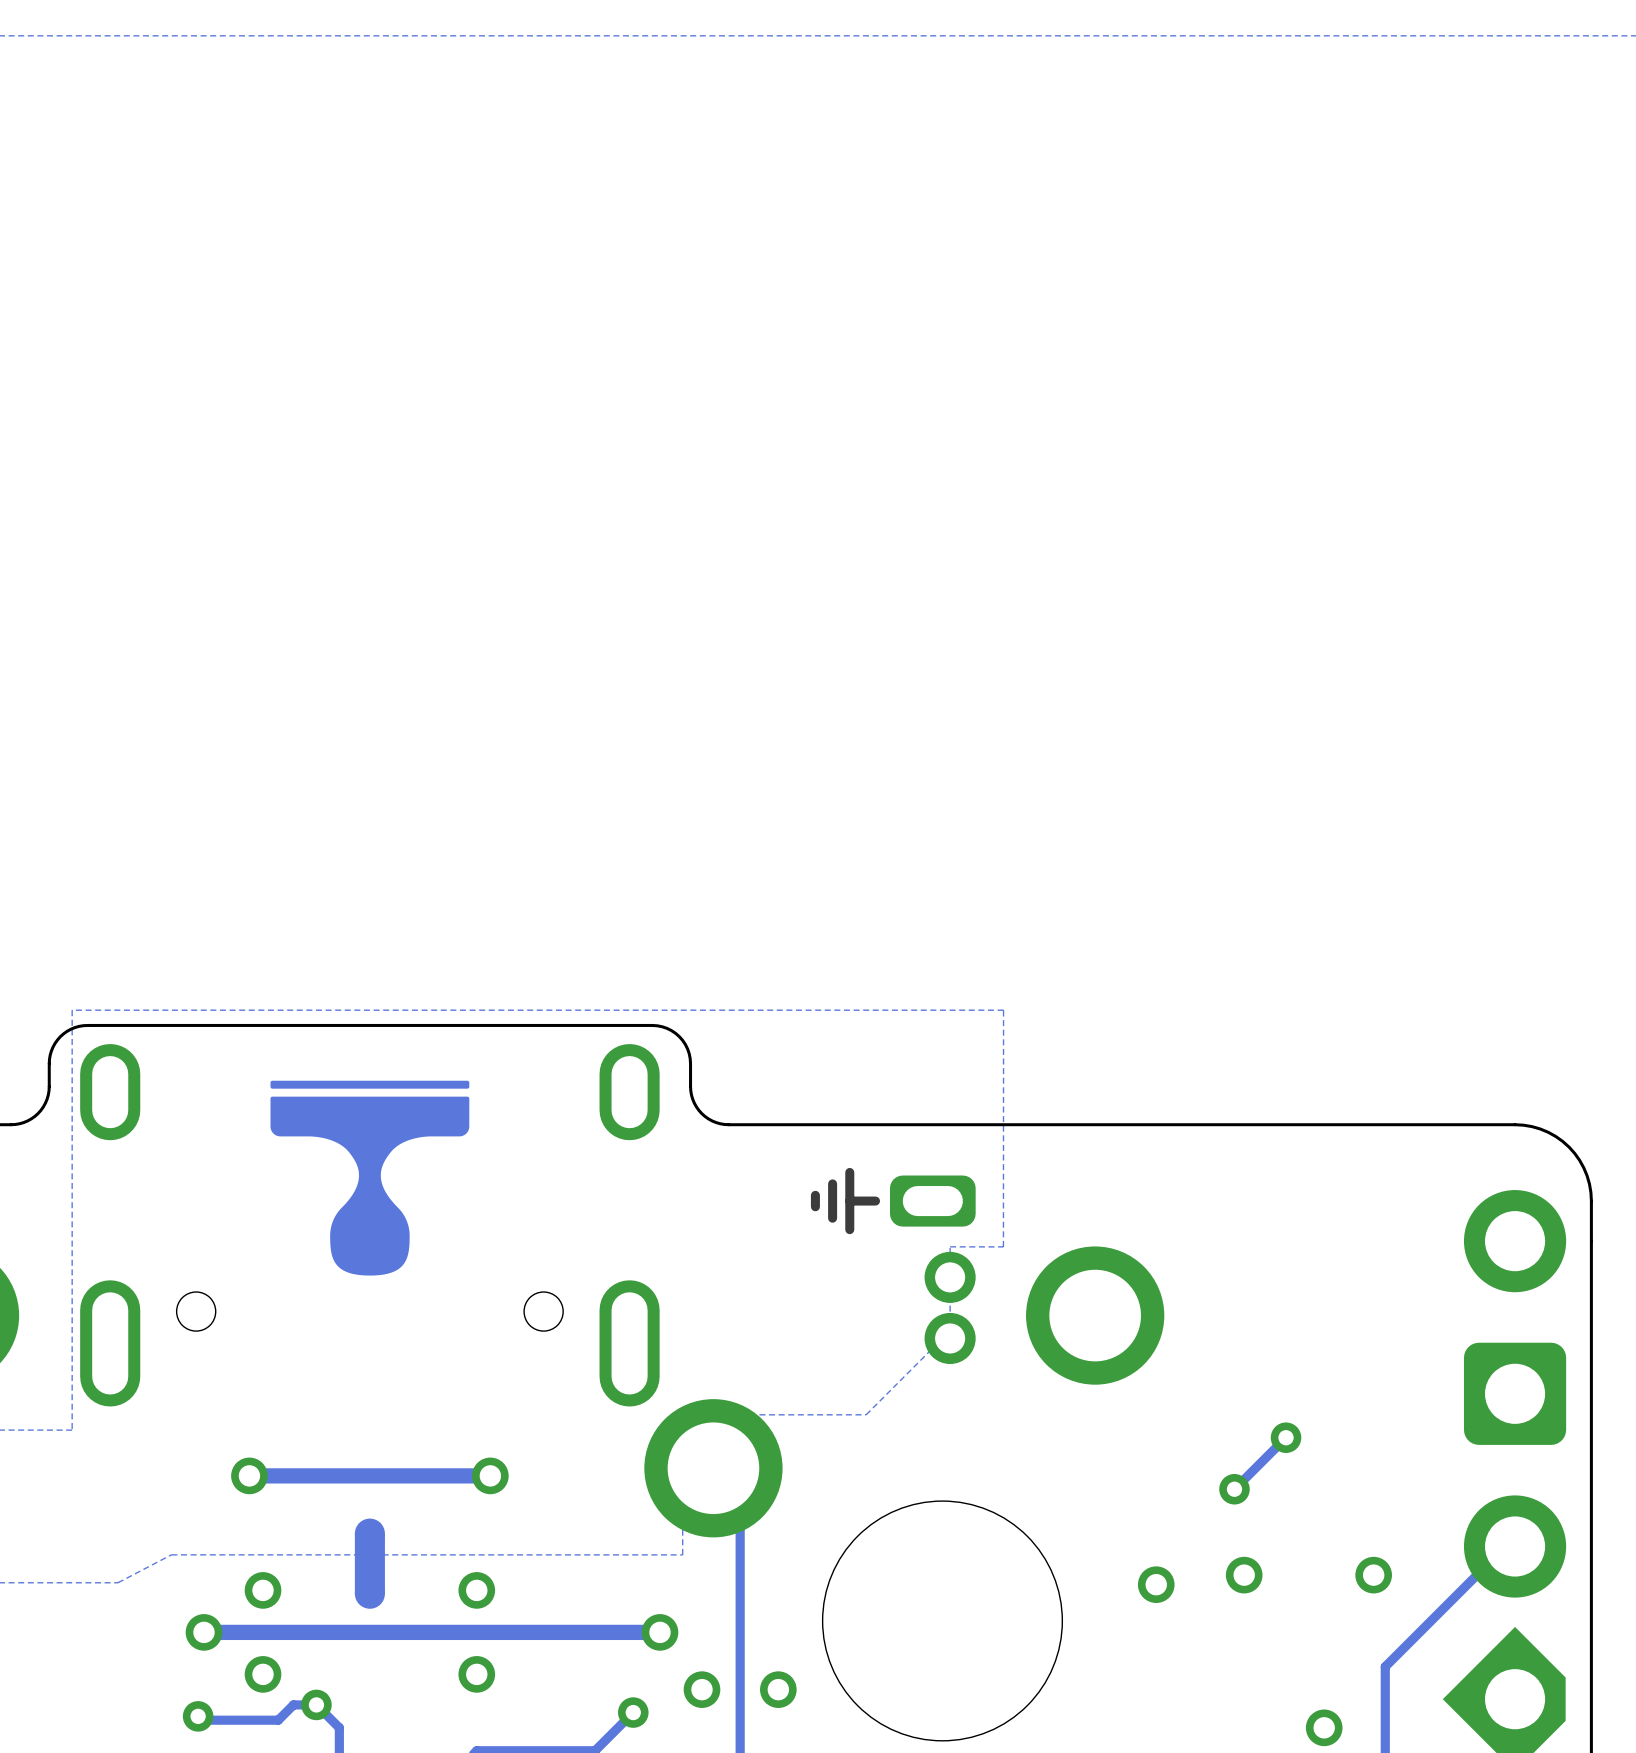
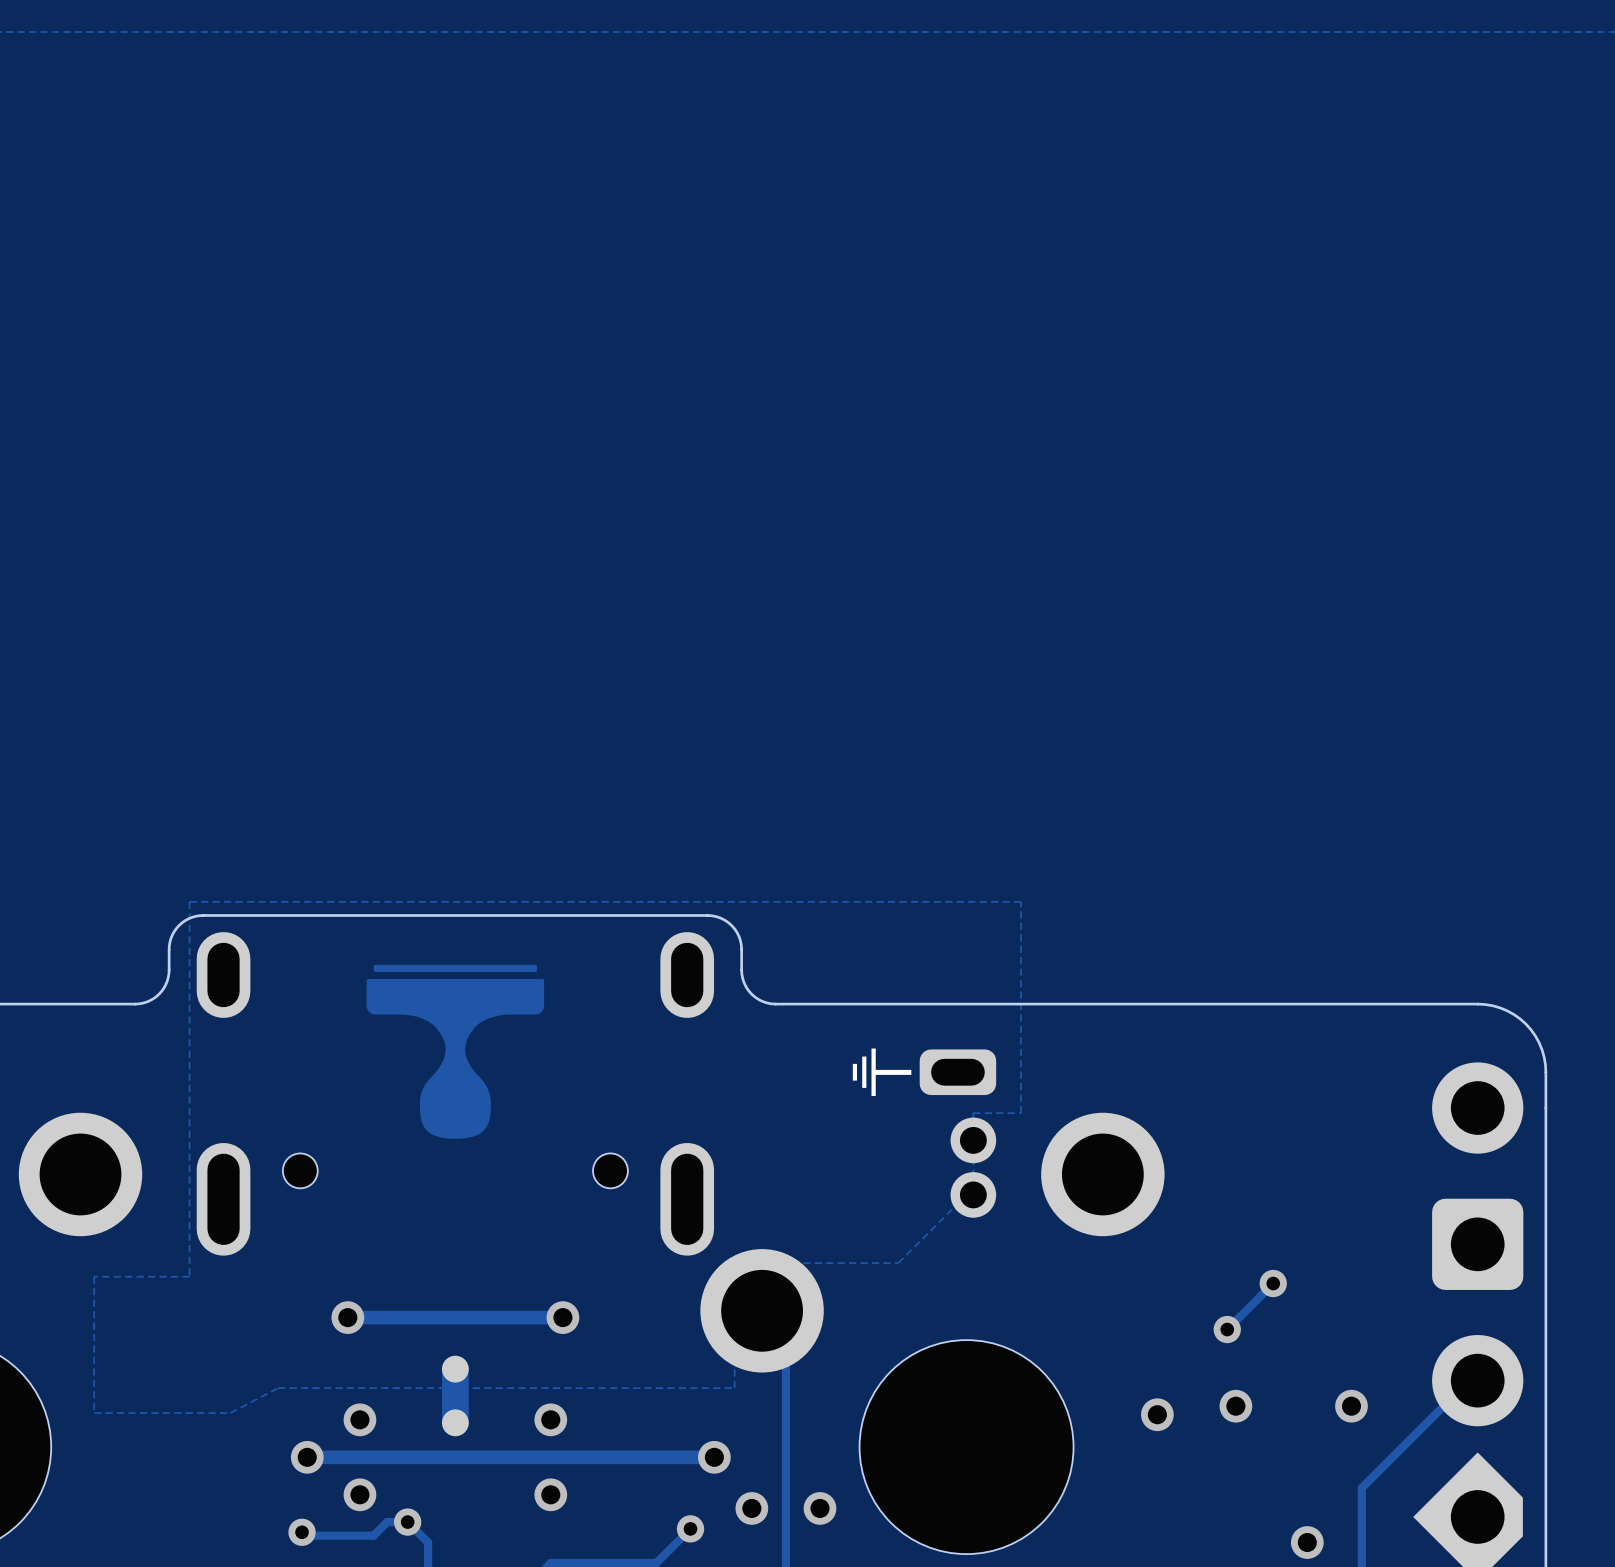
drawing shape: [270, 1080, 470, 1089] -> [373, 964, 538, 972]

